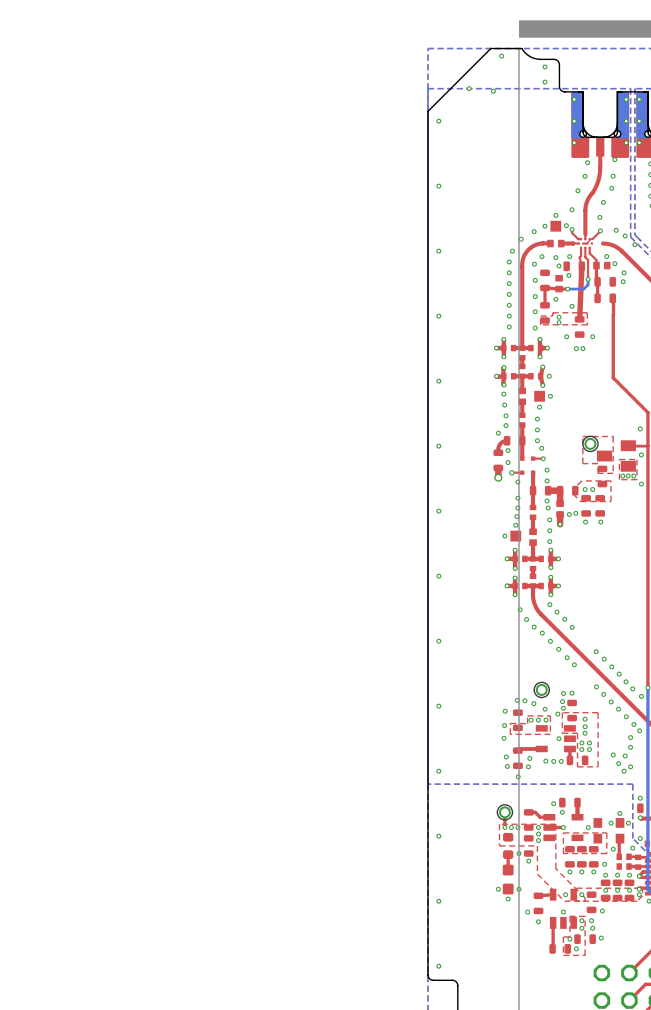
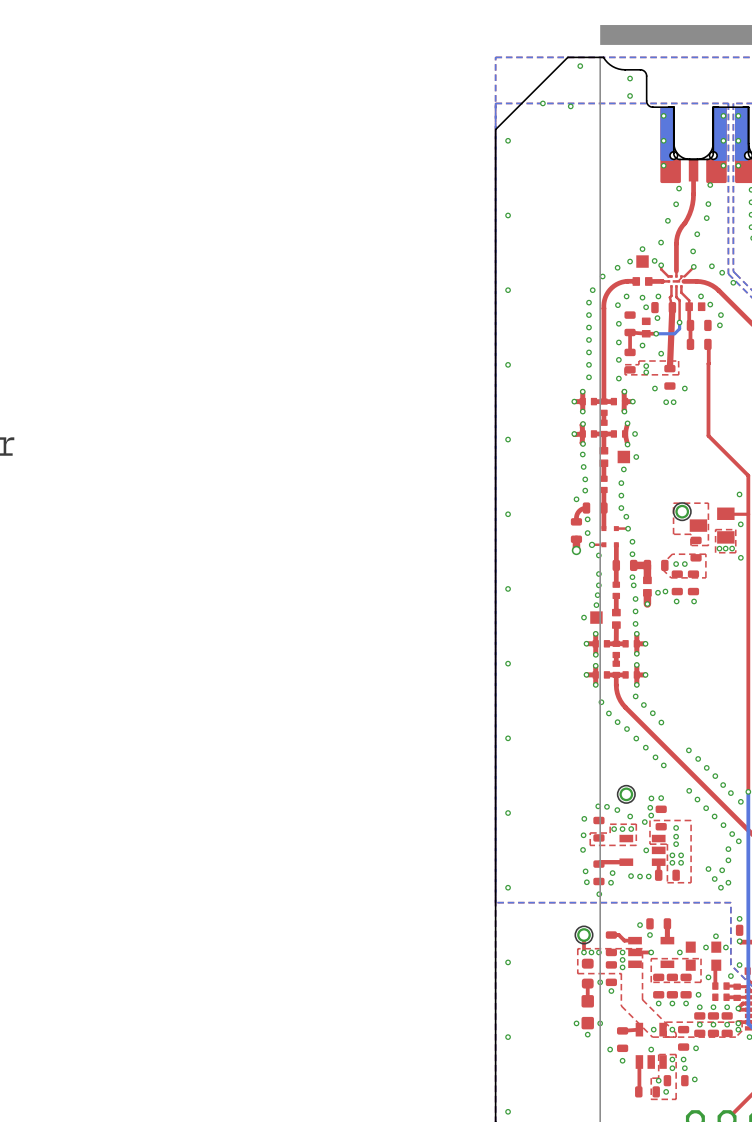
top track: none -> (696, 281) (683, 281)

